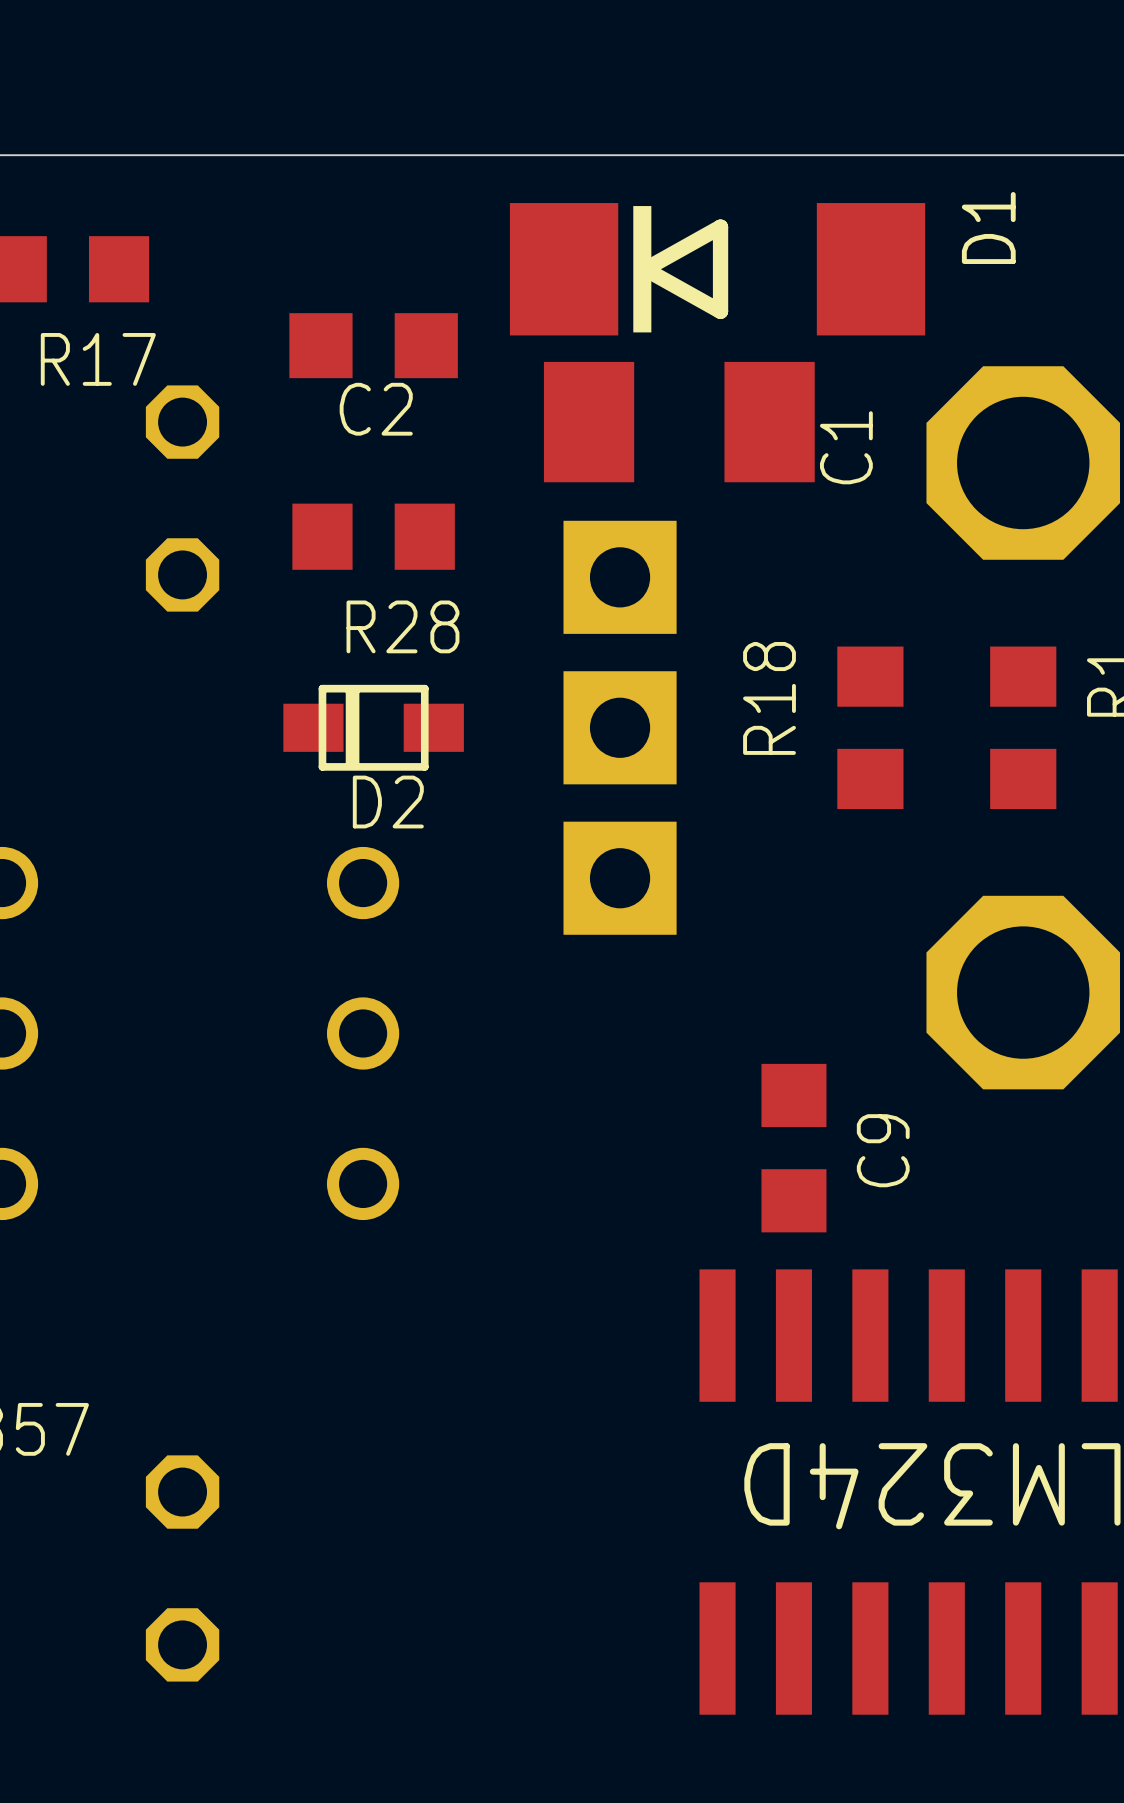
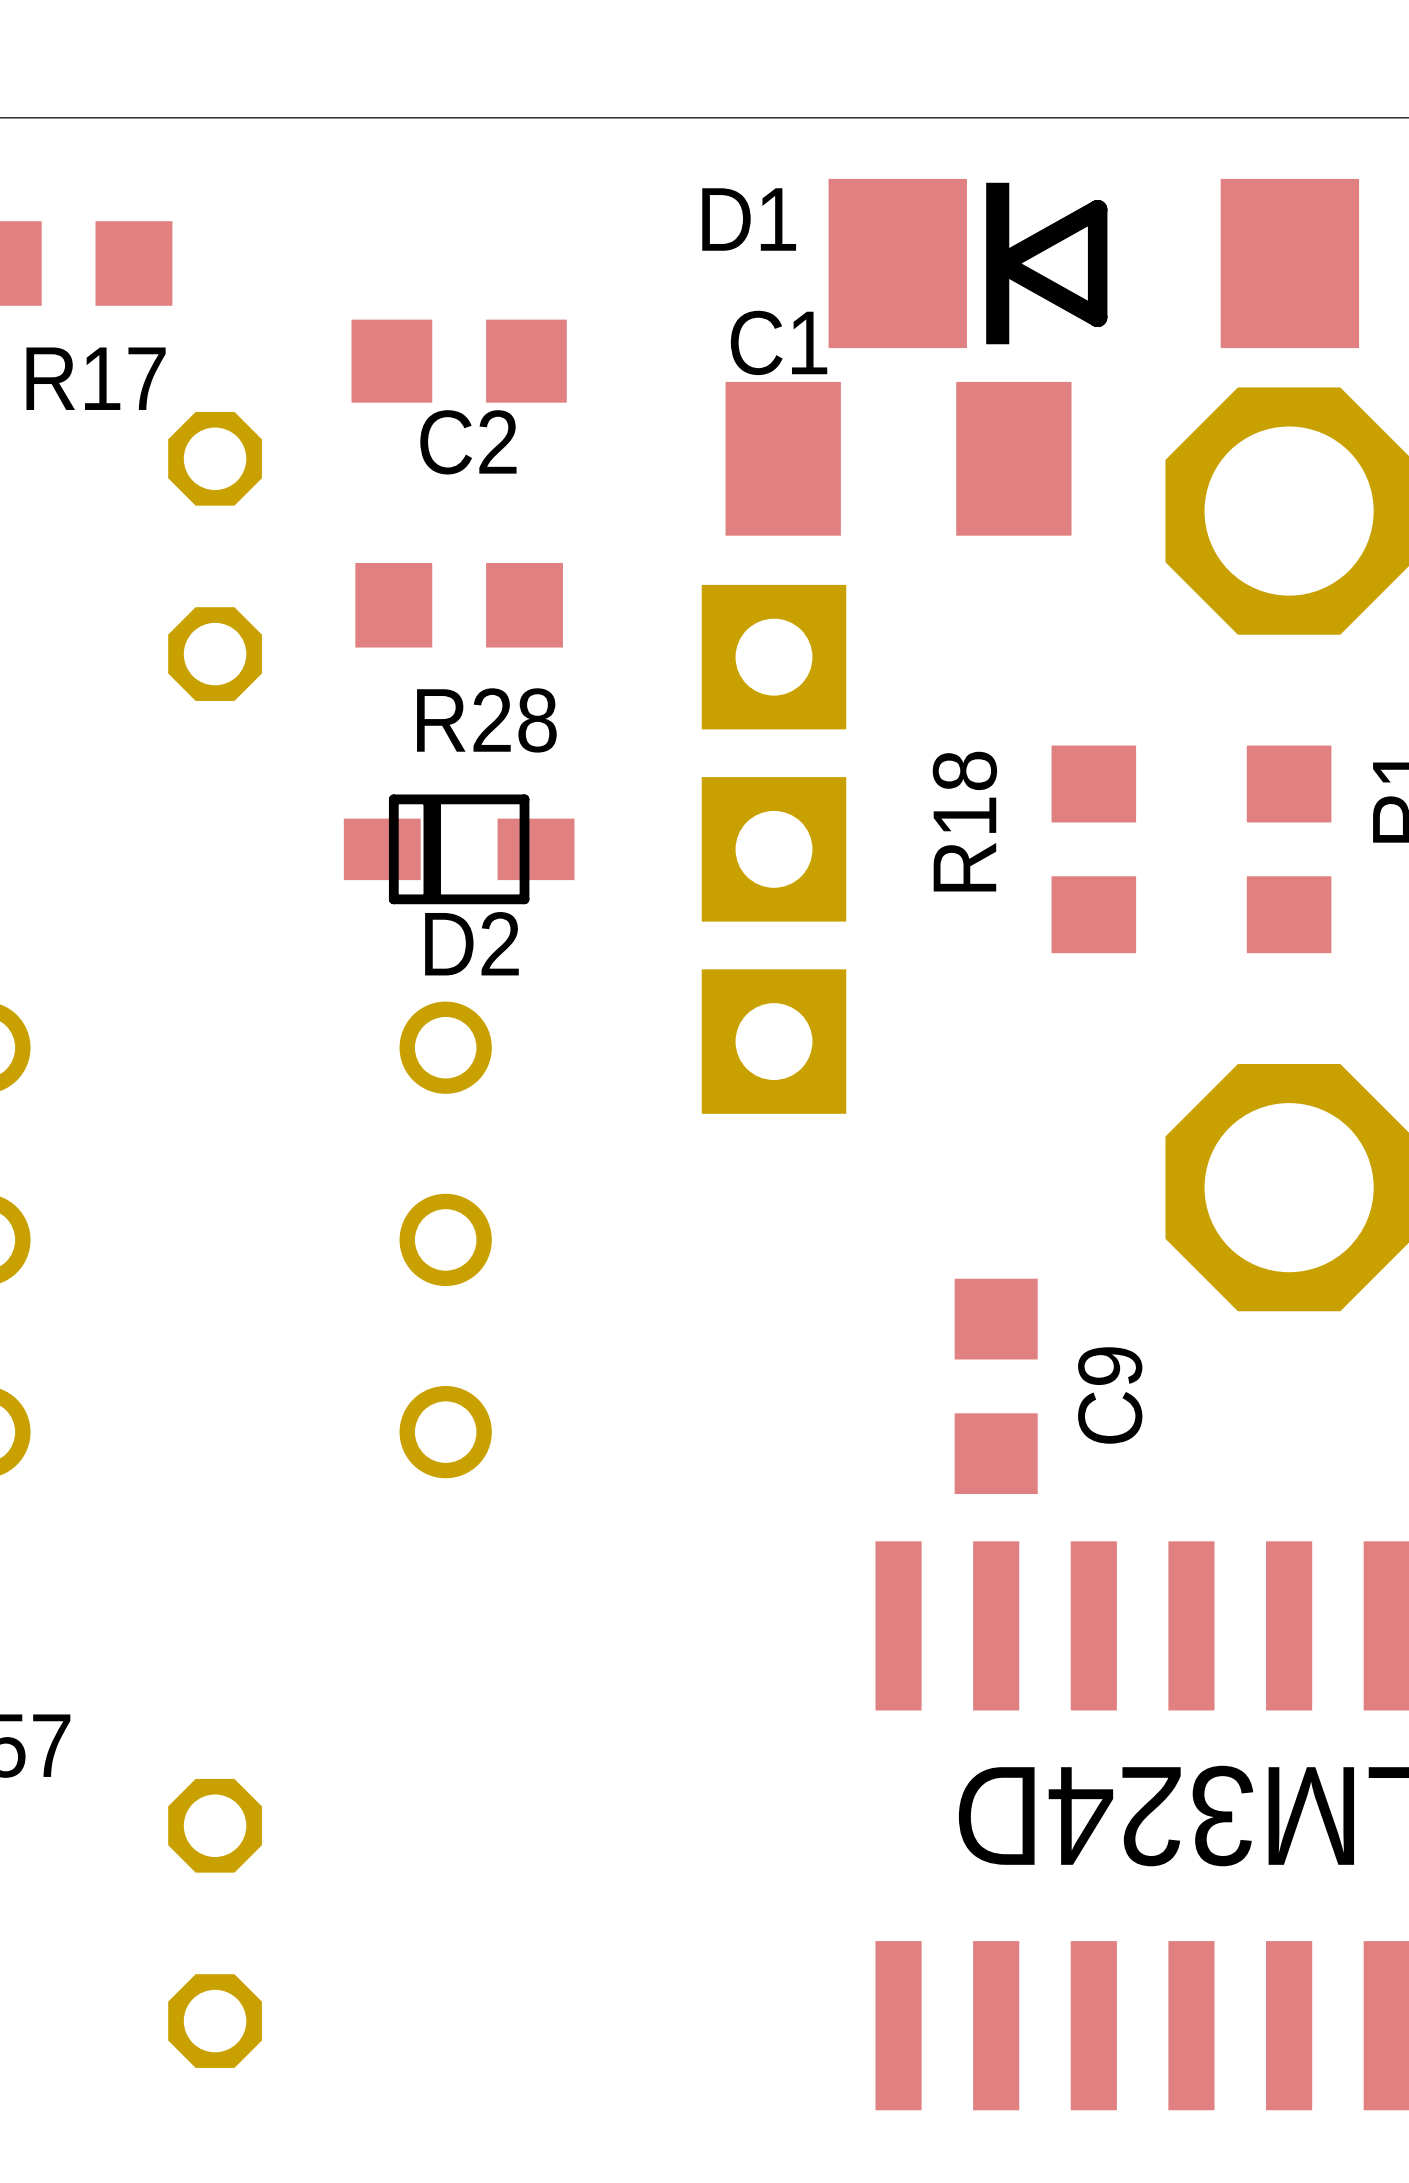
D1 name rotation: 0° (988, 228) -> 90° clockwise (749, 219)
D1 name position: D1 (988, 228) -> D1 (749, 219)
D1 position: (717, 269) -> (1093, 263)
C1 position: (679, 422) -> (898, 458)
C1 name rotation: 0° (846, 447) -> 90° clockwise (779, 342)
C1 name position: C1 (846, 447) -> C1 (779, 342)

